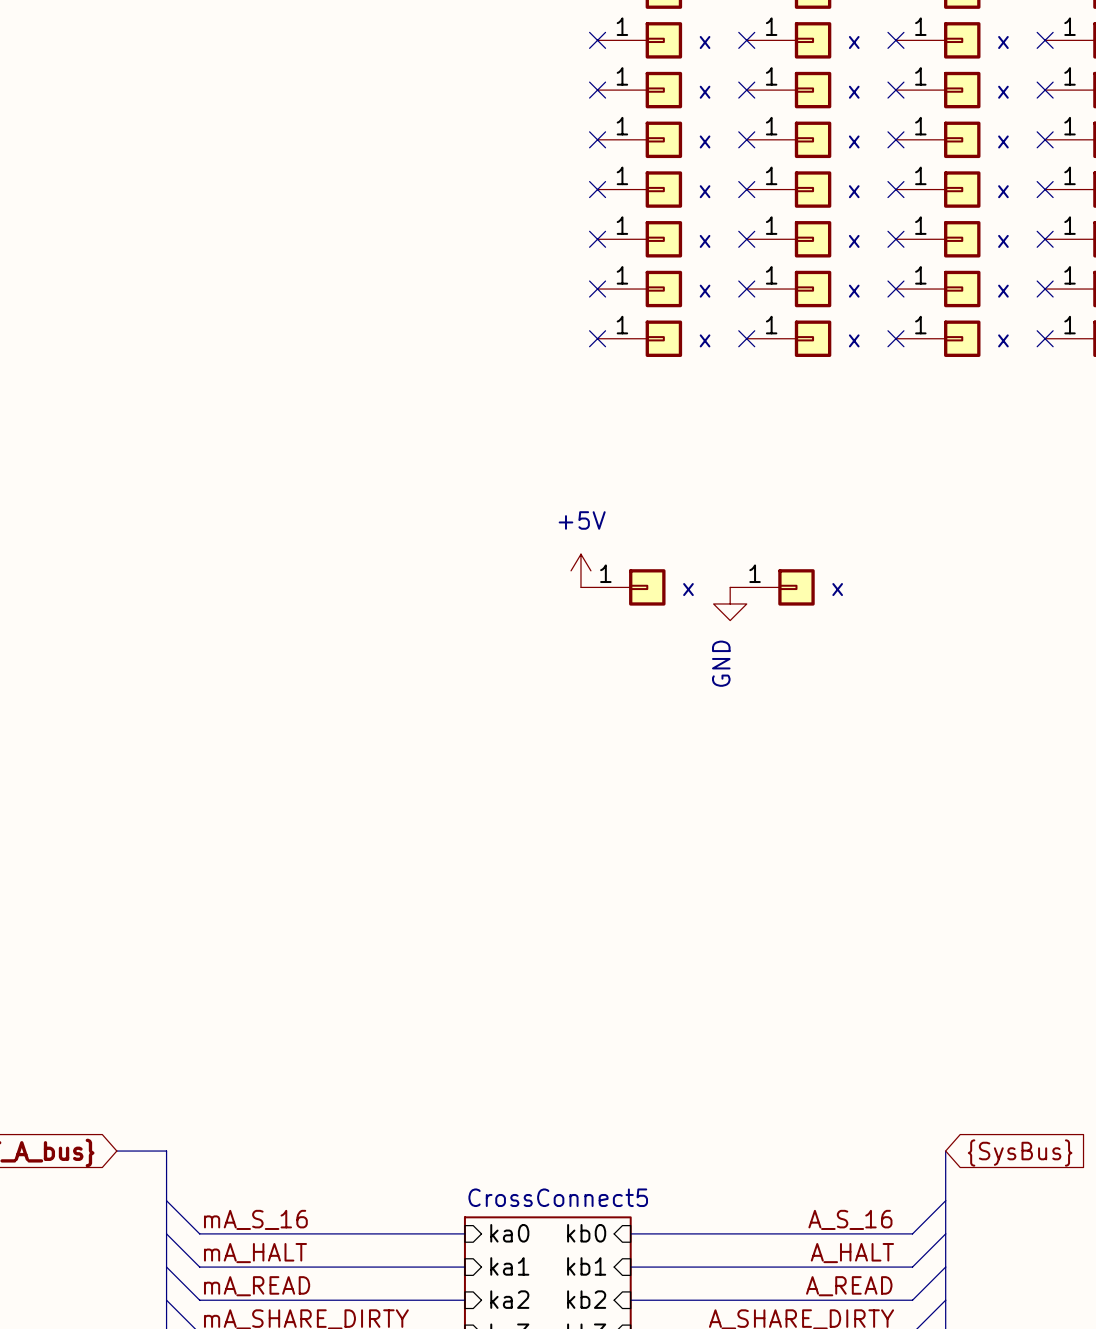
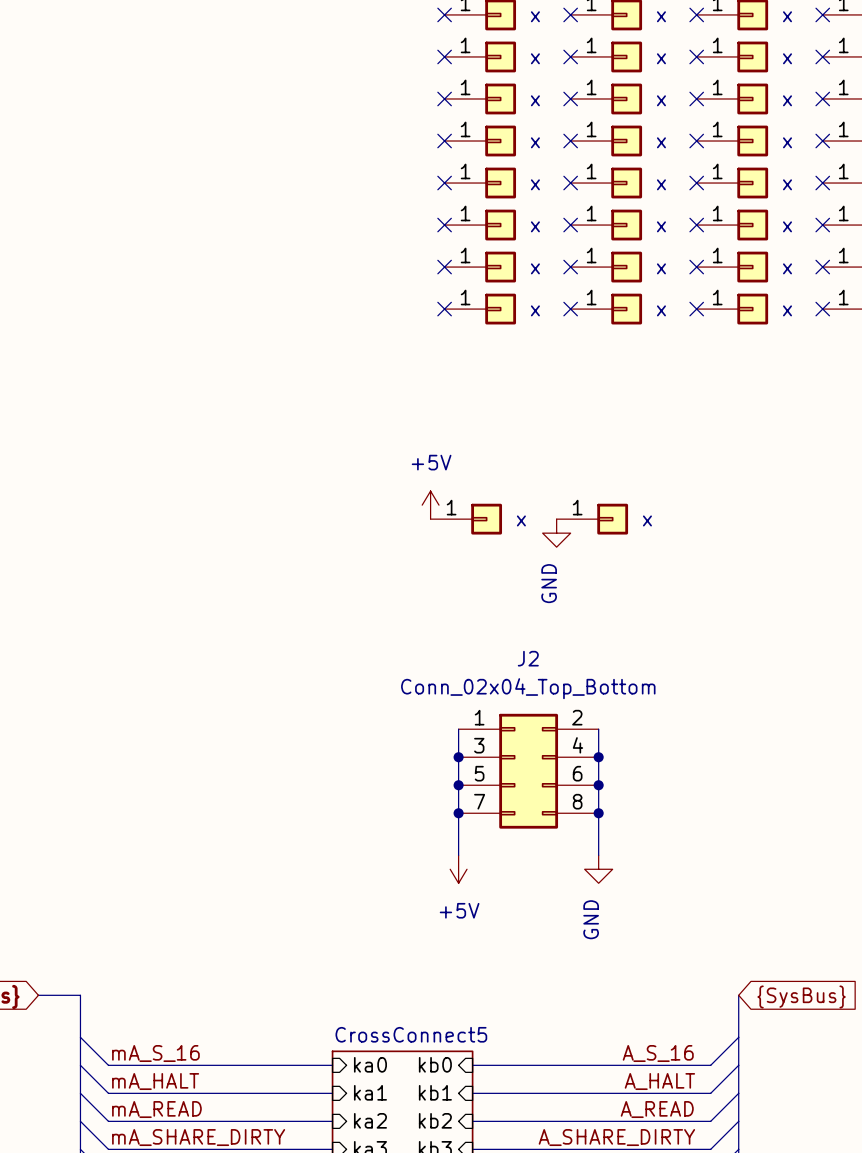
wire: none -> (458, 729) (458, 855)
wire: none -> (598, 729) (598, 855)
junction: none -> (458, 757)
junction: none -> (598, 757)
J2: none -> Conn_02x04_Top_Bottom (528, 771)
junction: none -> (458, 785)
junction: none -> (598, 785)
junction: none -> (458, 813)
junction: none -> (598, 813)
power symbol: none -> +5V (458, 869)
power symbol: none -> GND (598, 869)

